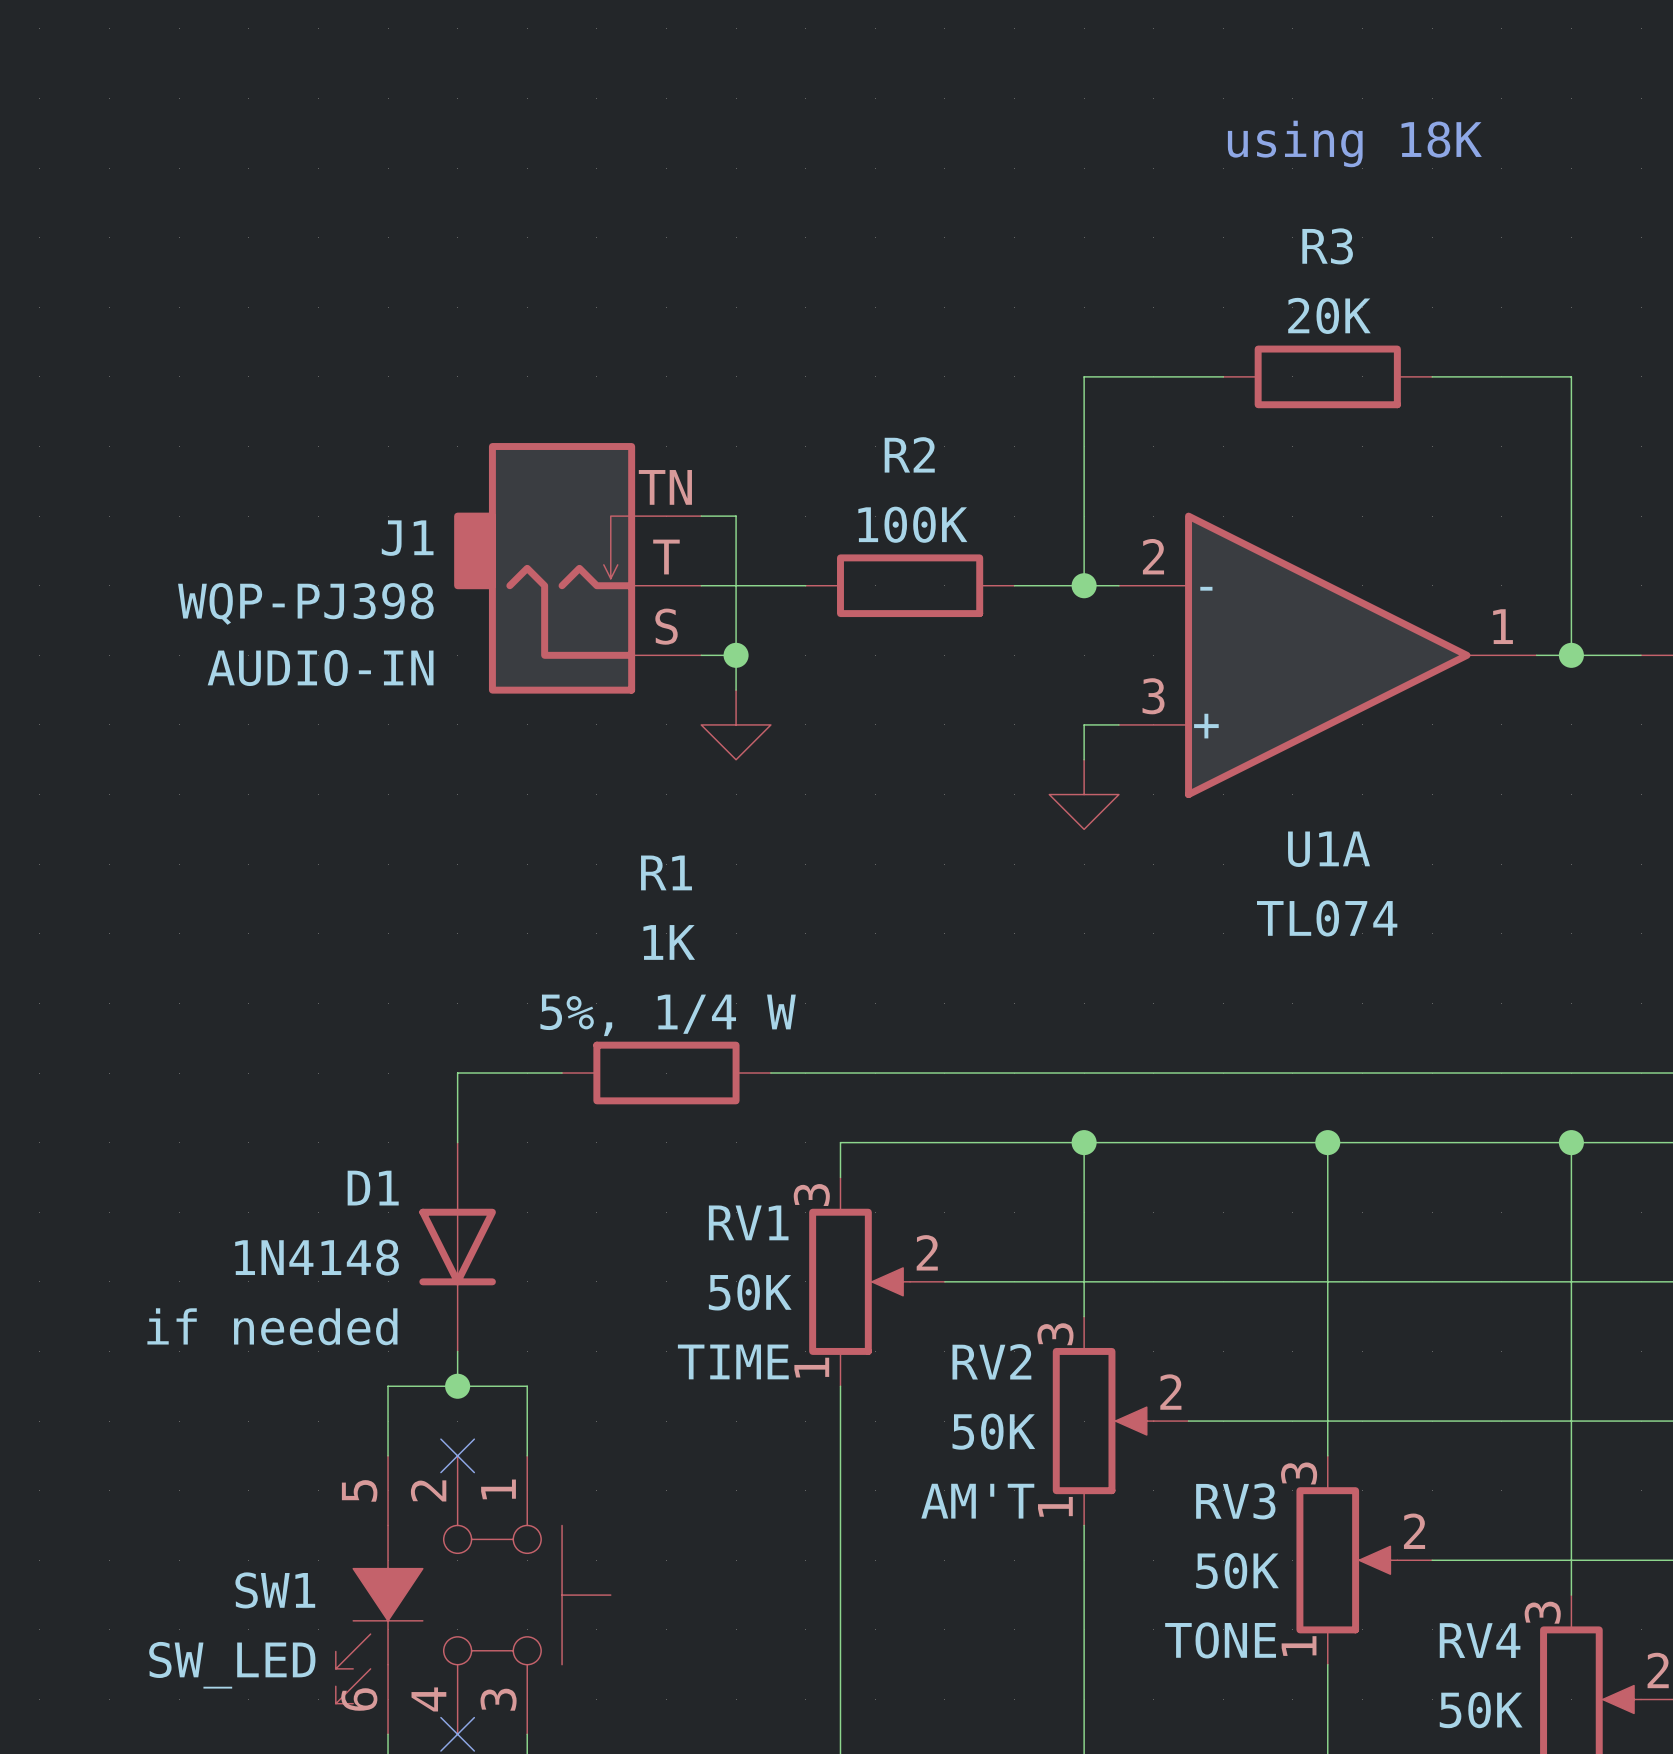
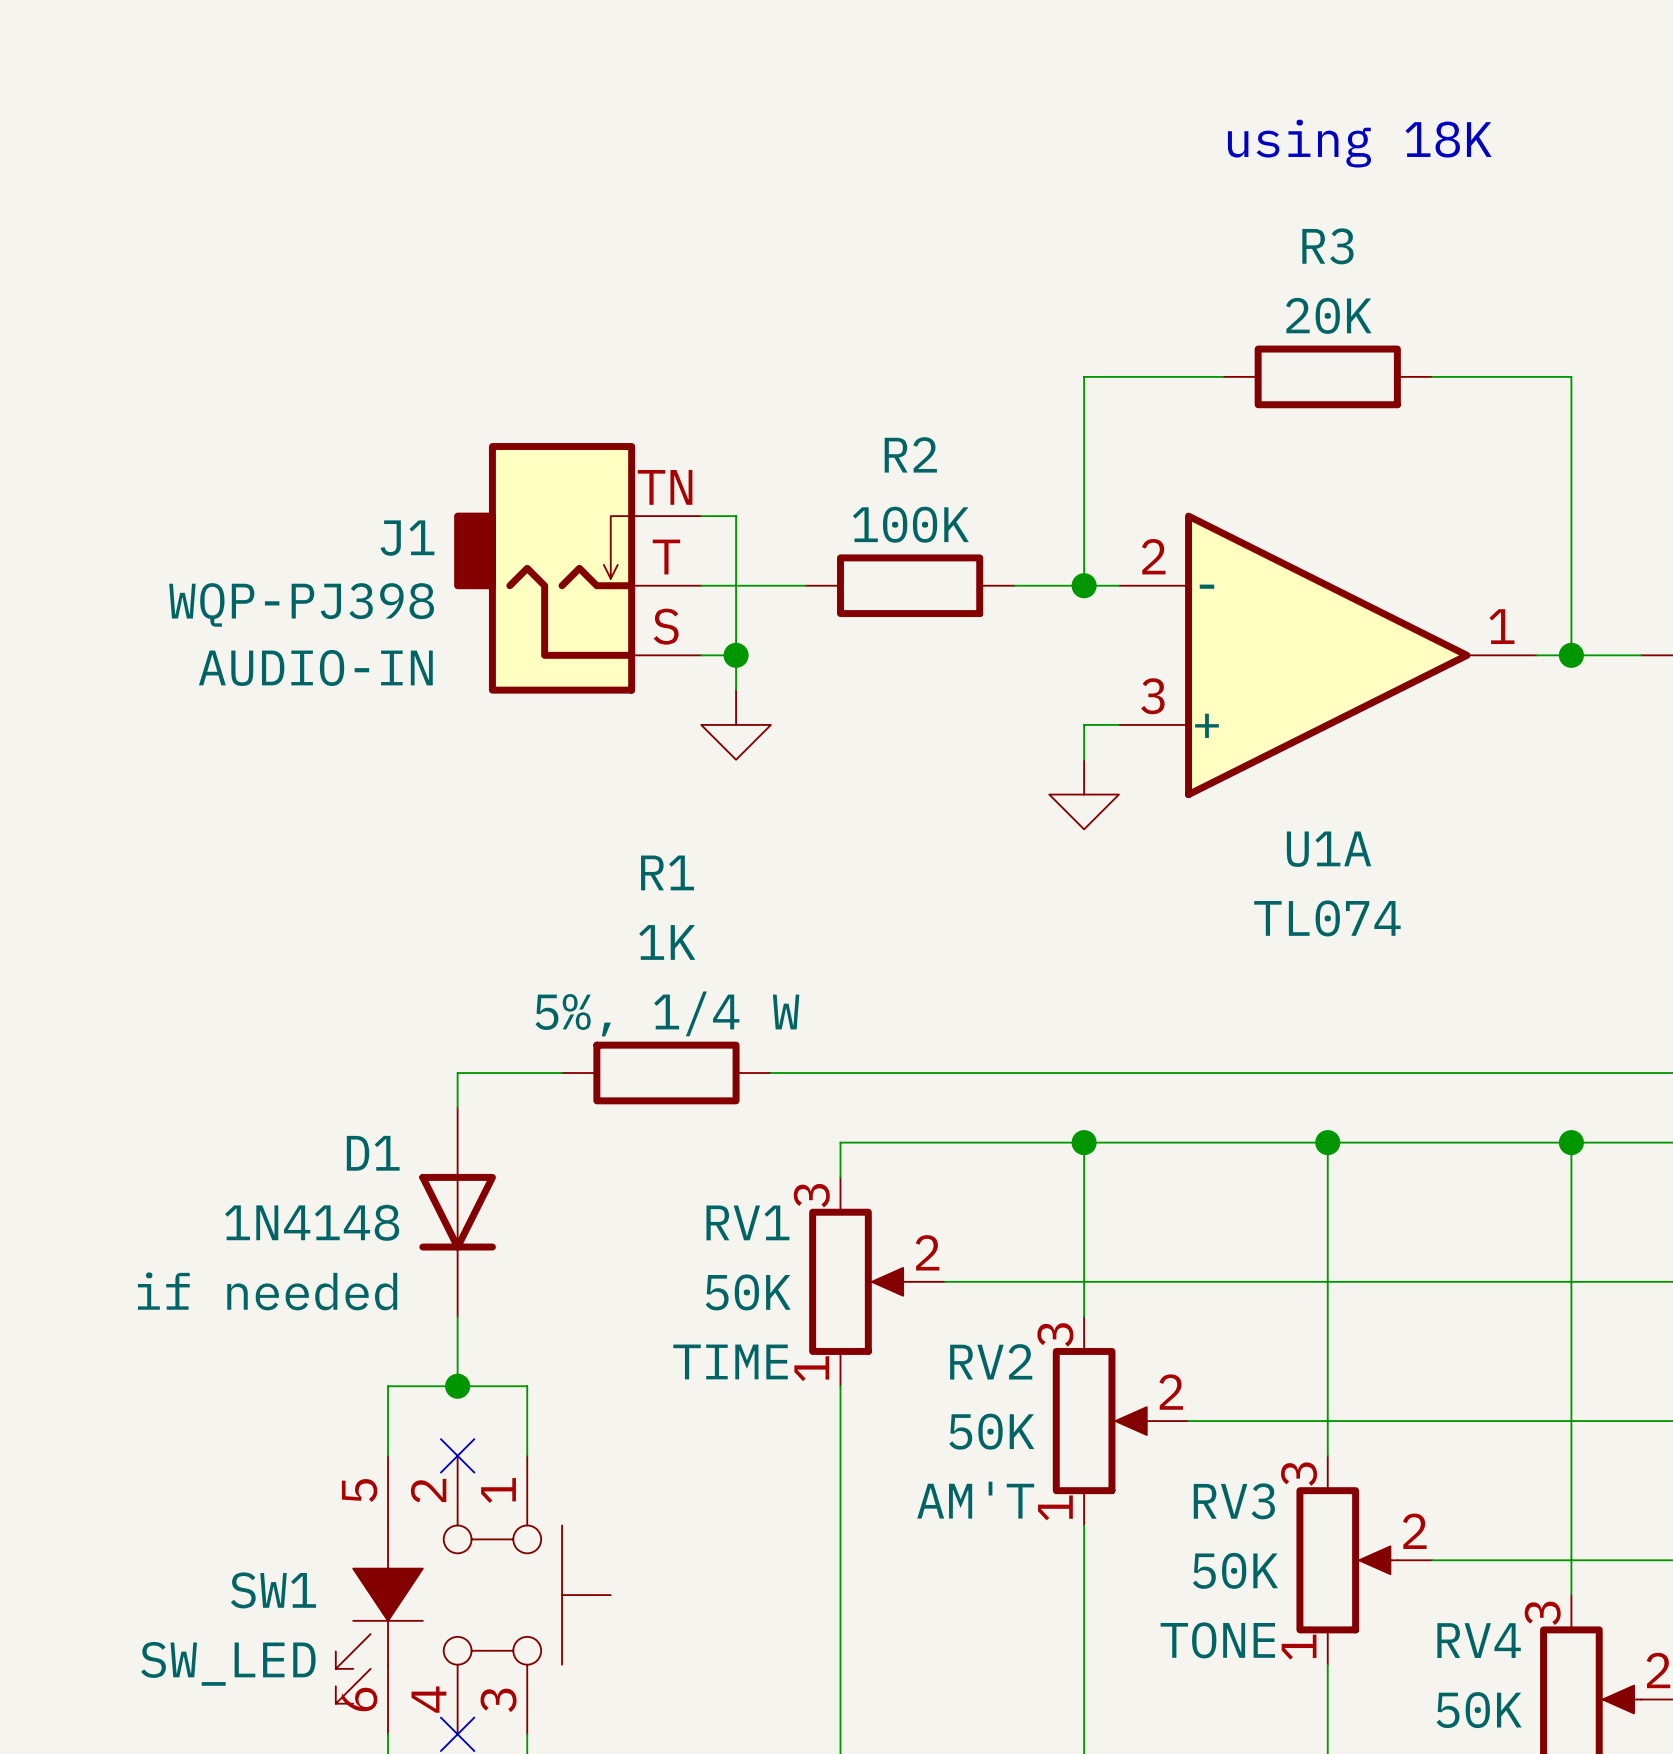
D1 position: (457, 1247) -> (457, 1212)

